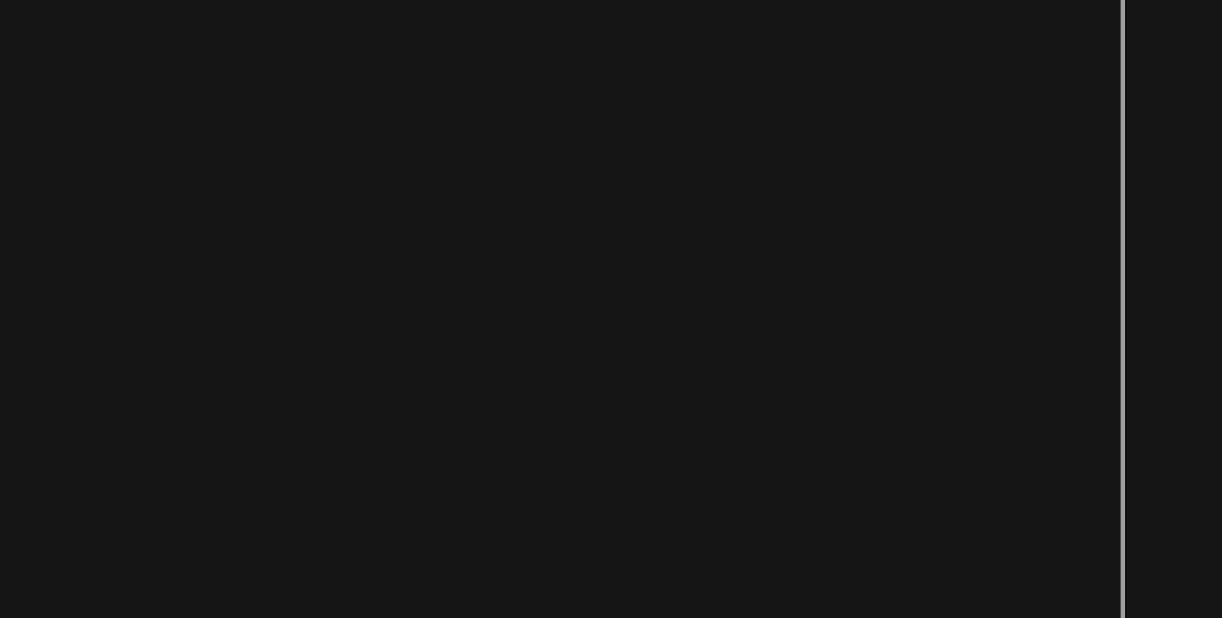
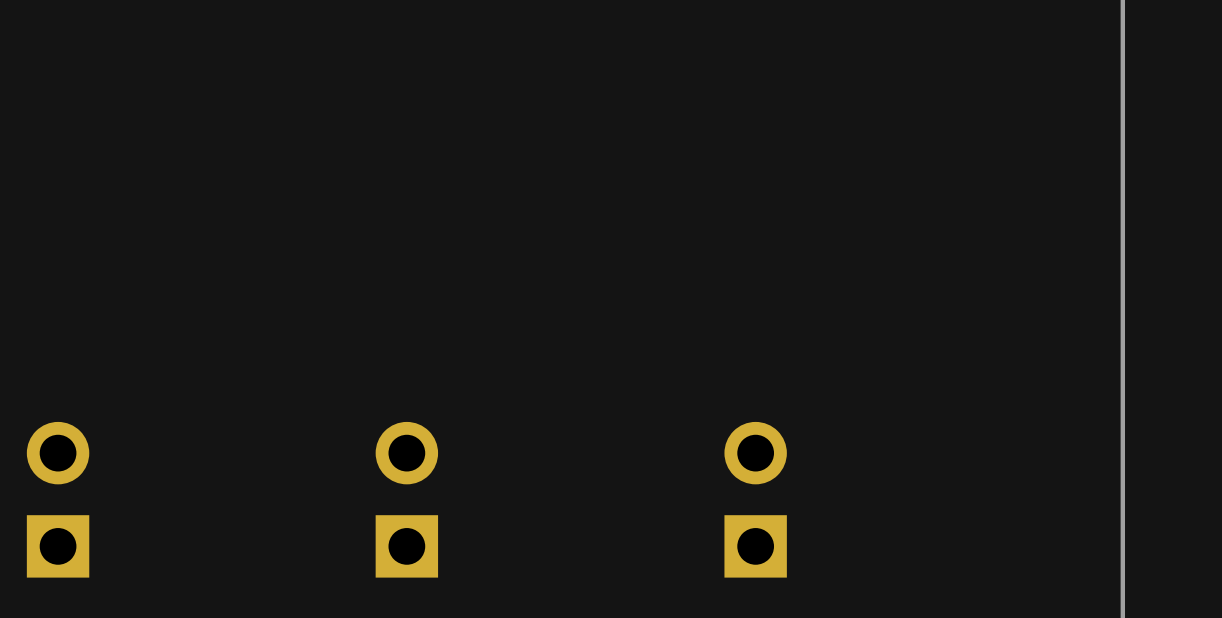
part: none -> (58, 499)
part: none -> (406, 499)
part: none -> (755, 499)

